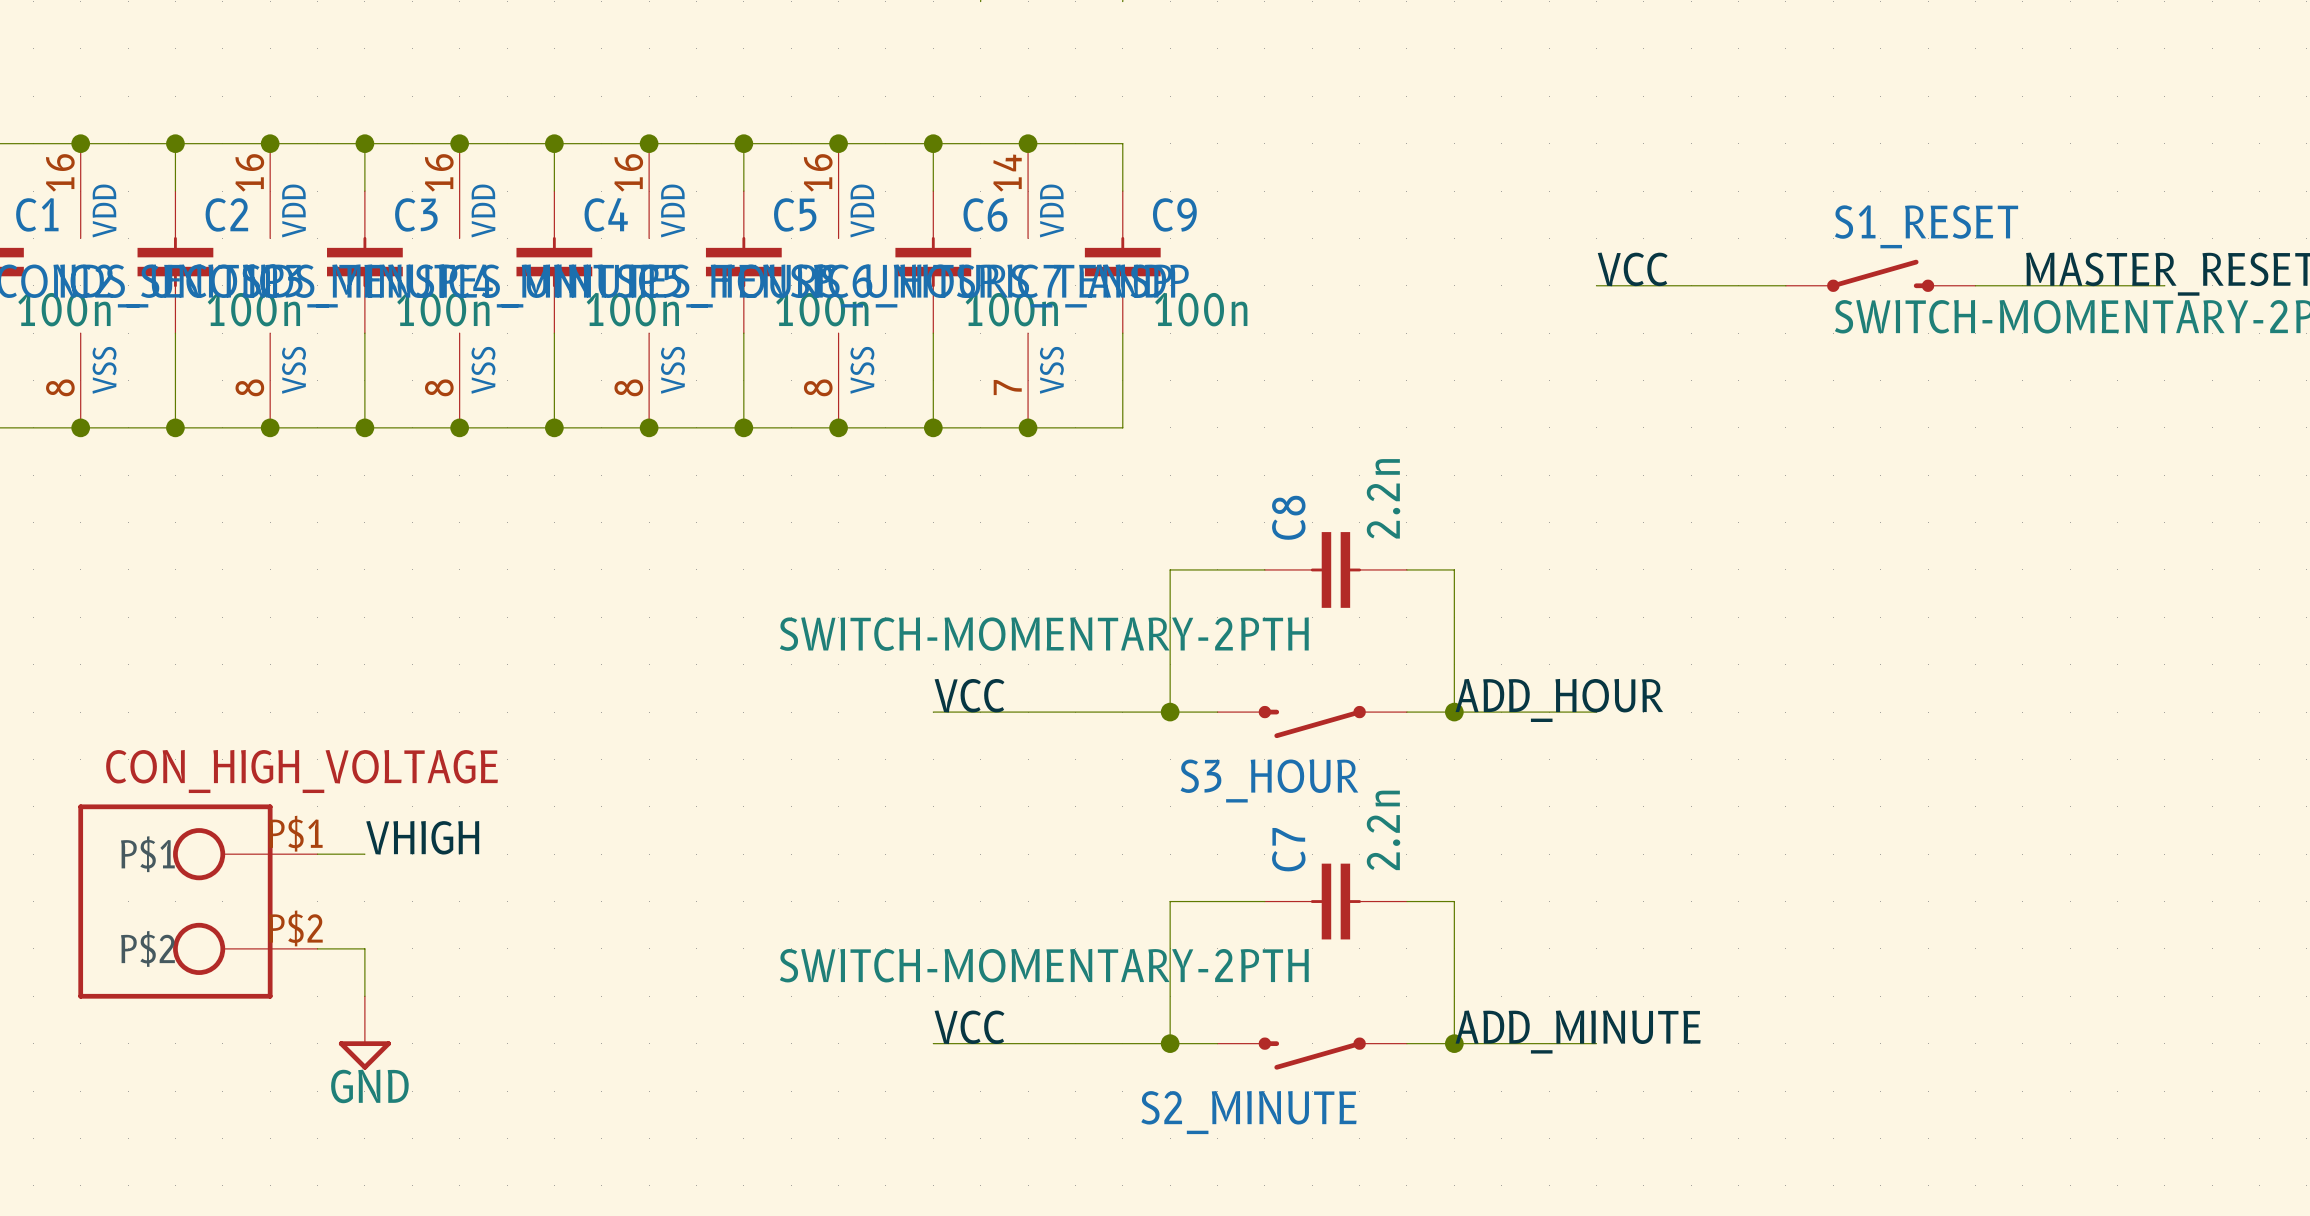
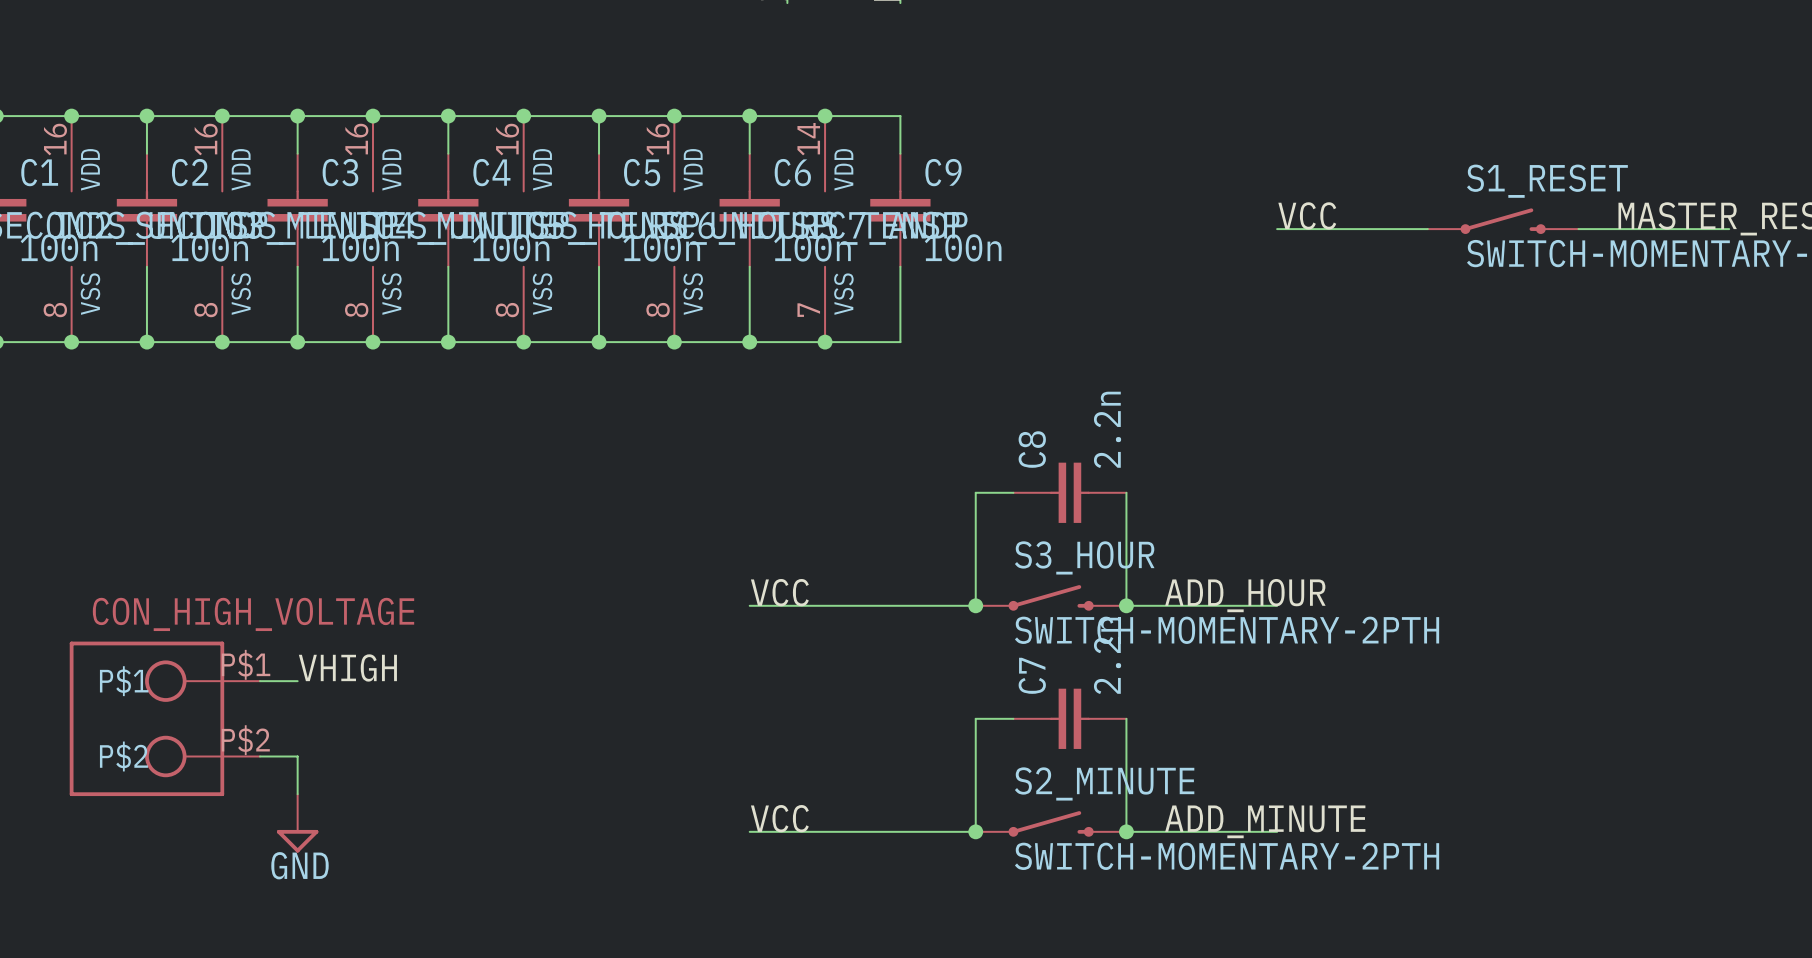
wire: (1264, 569) (1170, 569) (1170, 712) -> none
C8 position: (1335, 569) -> (1069, 492)
wire: (1406, 569) (1454, 569) (1454, 712) -> none
wire: none -> (1013, 492) (975, 492) (975, 605) (749, 605)
wire: none -> (1126, 492) (1126, 605) (1277, 605)
S3_HOUR value position: SWITCH-MOMENTARY-2PTH (1044, 634) -> SWITCH-MOMENTARY-2PTH (1227, 630)
label position: VCC (969, 695) -> VCC (779, 592)
label position: ADD_HOUR (1559, 700) -> ADD_HOUR (1245, 595)
wire: (933, 712) (1217, 712) -> none
junction position: (1170, 712) -> (975, 605)
wire: (1406, 712) (1596, 712) -> none
junction position: (1454, 712) -> (1126, 605)
S3_HOUR rotation: 0° (1312, 722) -> 180° (1051, 597)
wire: (1217, 901) (1170, 901) (1170, 1043) -> (975, 718) (975, 831)
wire: (1406, 901) (1454, 901) (1454, 1043) -> (1126, 718) (1126, 831)
S2_MINUTE value position: SWITCH-MOMENTARY-2PTH (1044, 965) -> SWITCH-MOMENTARY-2PTH (1227, 856)
junction position: (1170, 1043) -> (975, 831)
junction position: (1454, 1043) -> (1126, 831)
S2_MINUTE rotation: 0° (1312, 1053) -> 180° (1051, 823)

